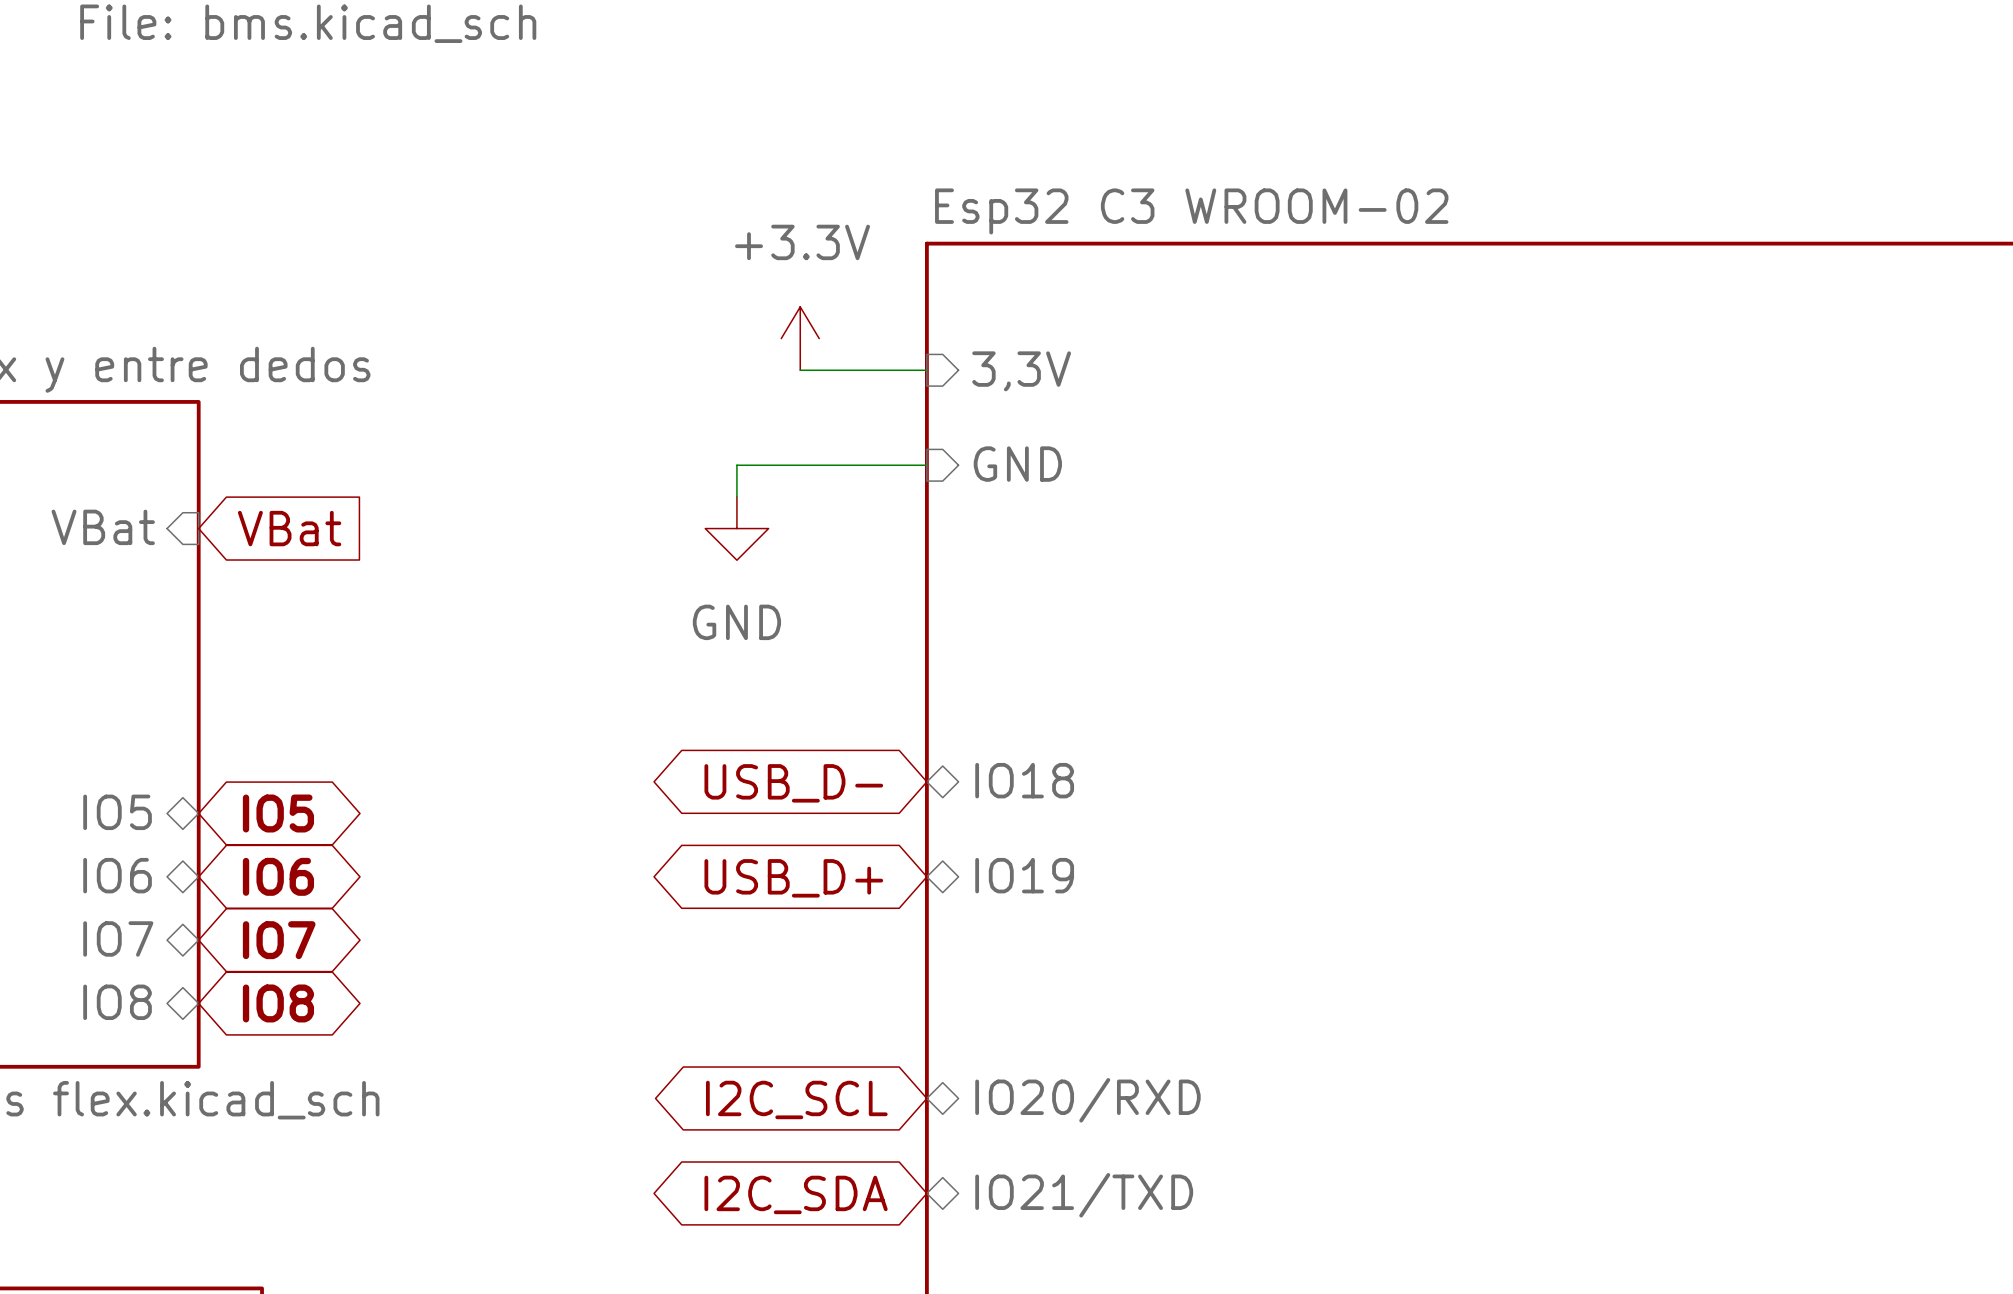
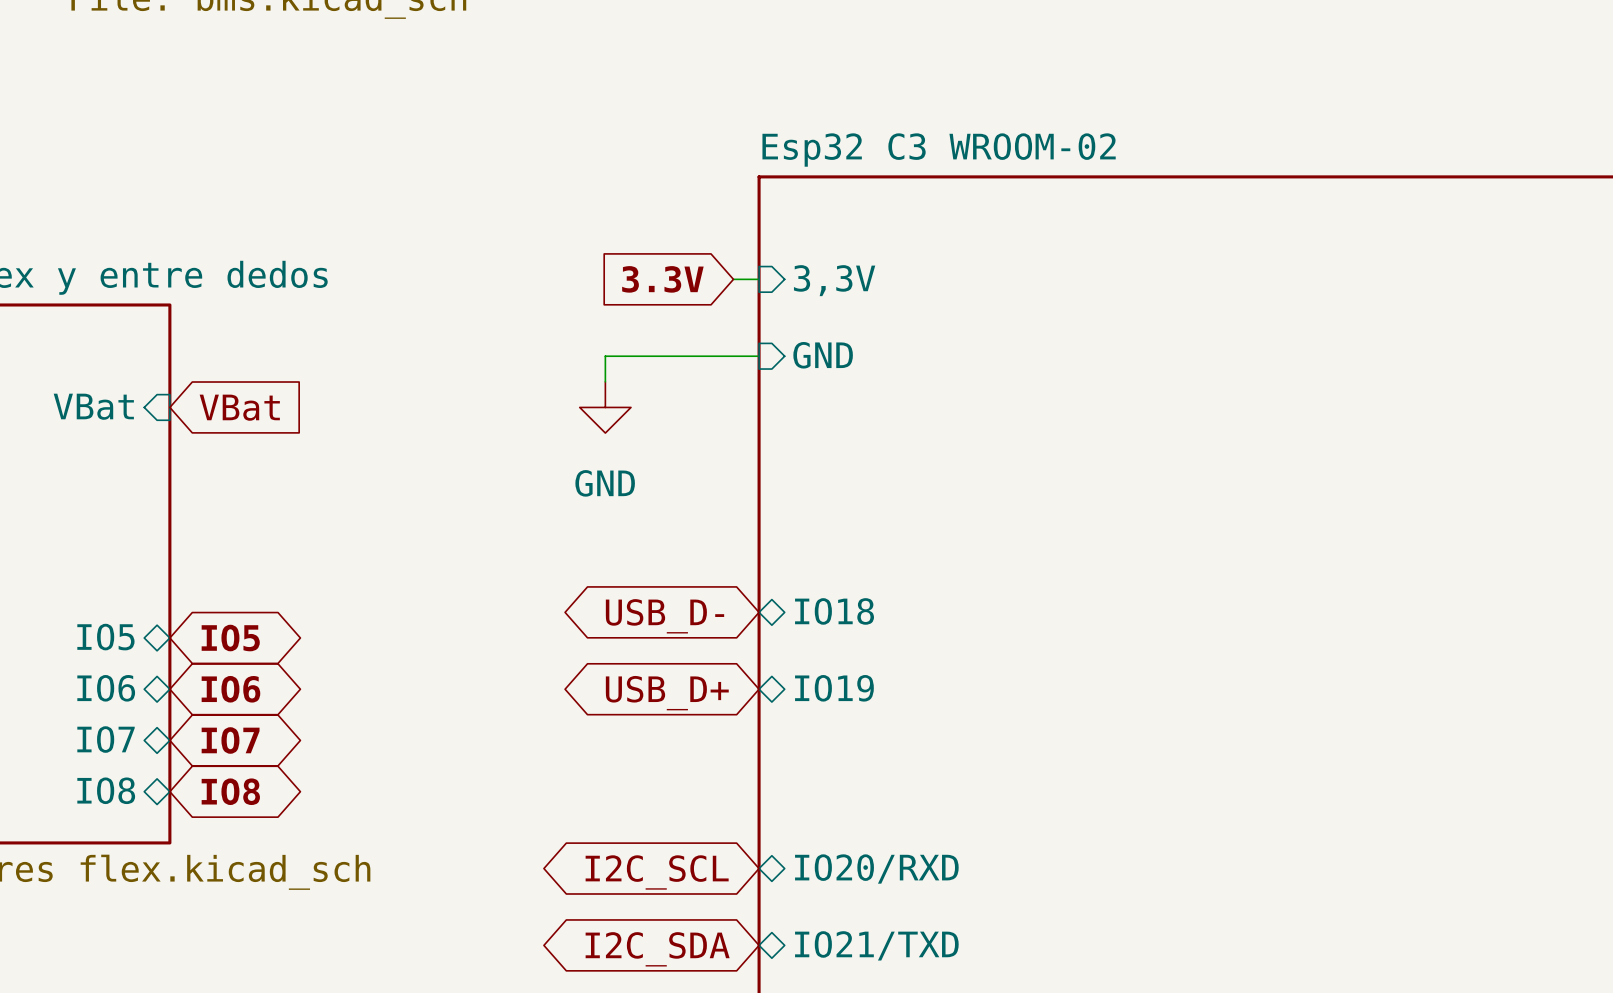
power symbol: +3.3V (800, 338) -> none
wire: (800, 370) (895, 370) -> none
global label: none -> 3.3V (662, 279)

